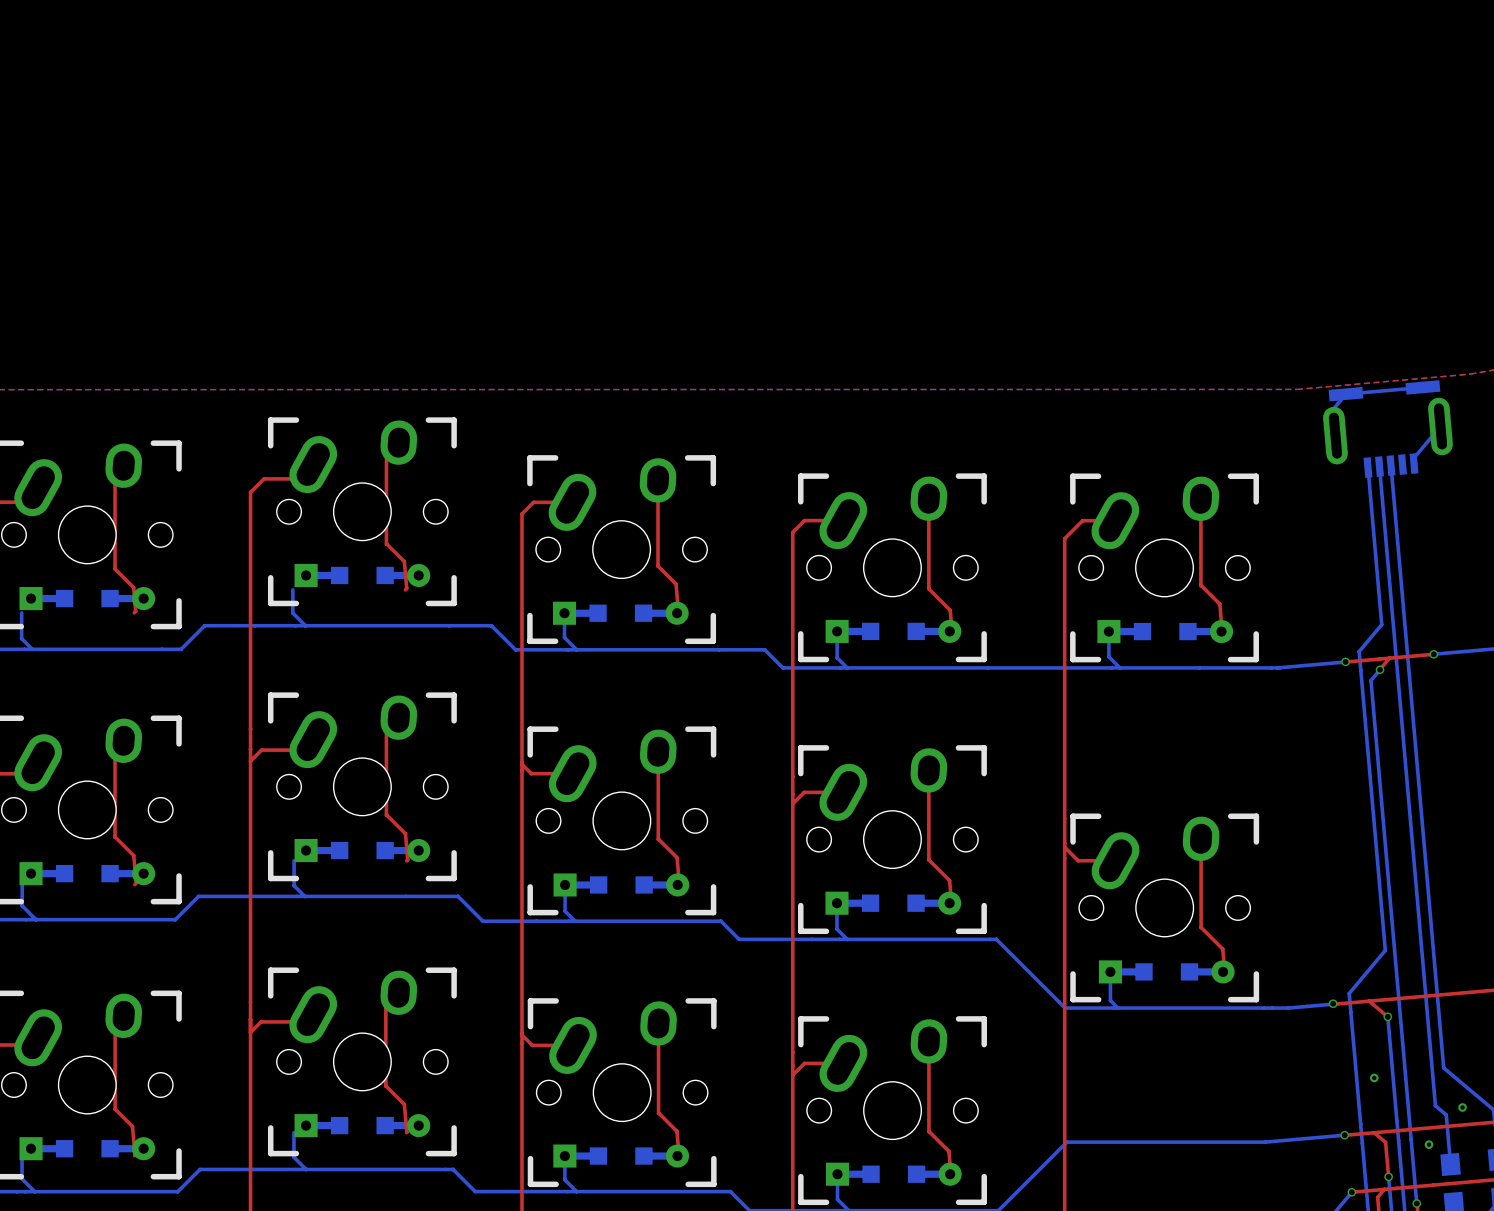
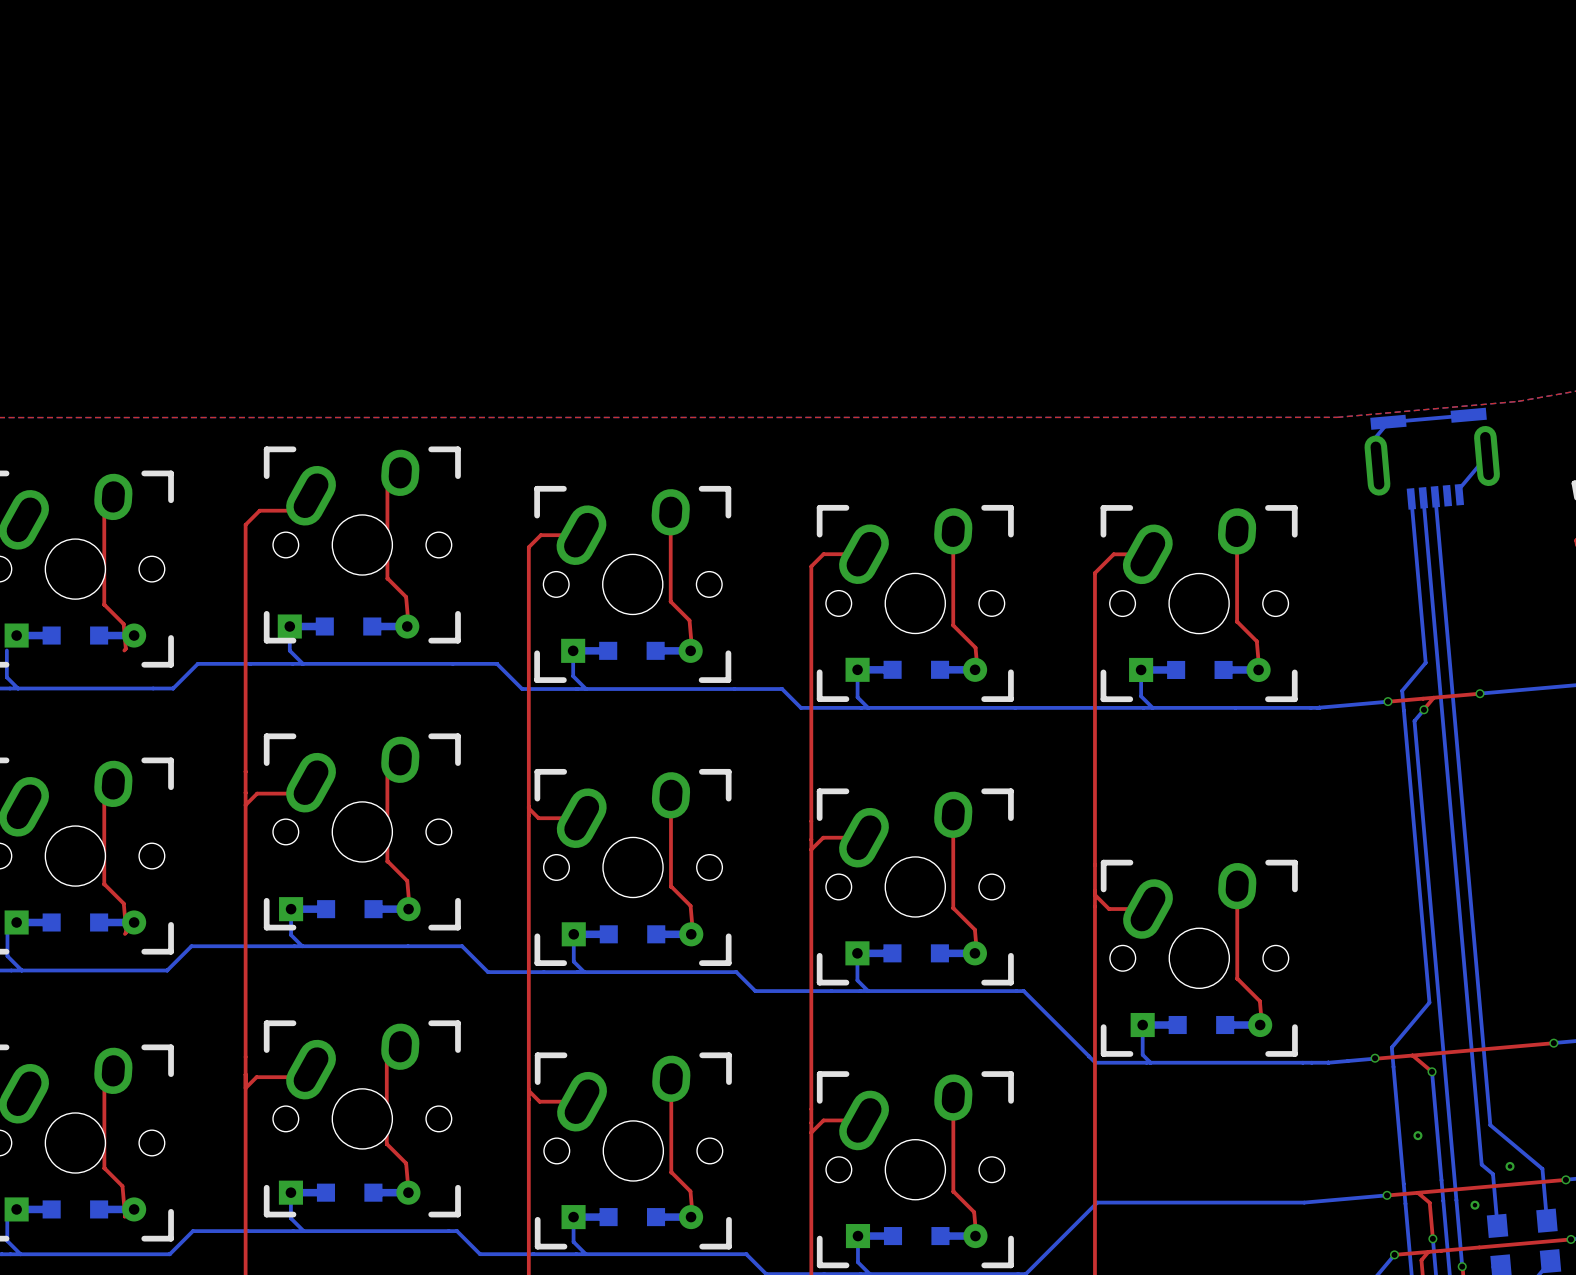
part position: (362, 575) -> (348, 626)
part position: (362, 850) -> (349, 909)
part position: (362, 1125) -> (349, 1192)

